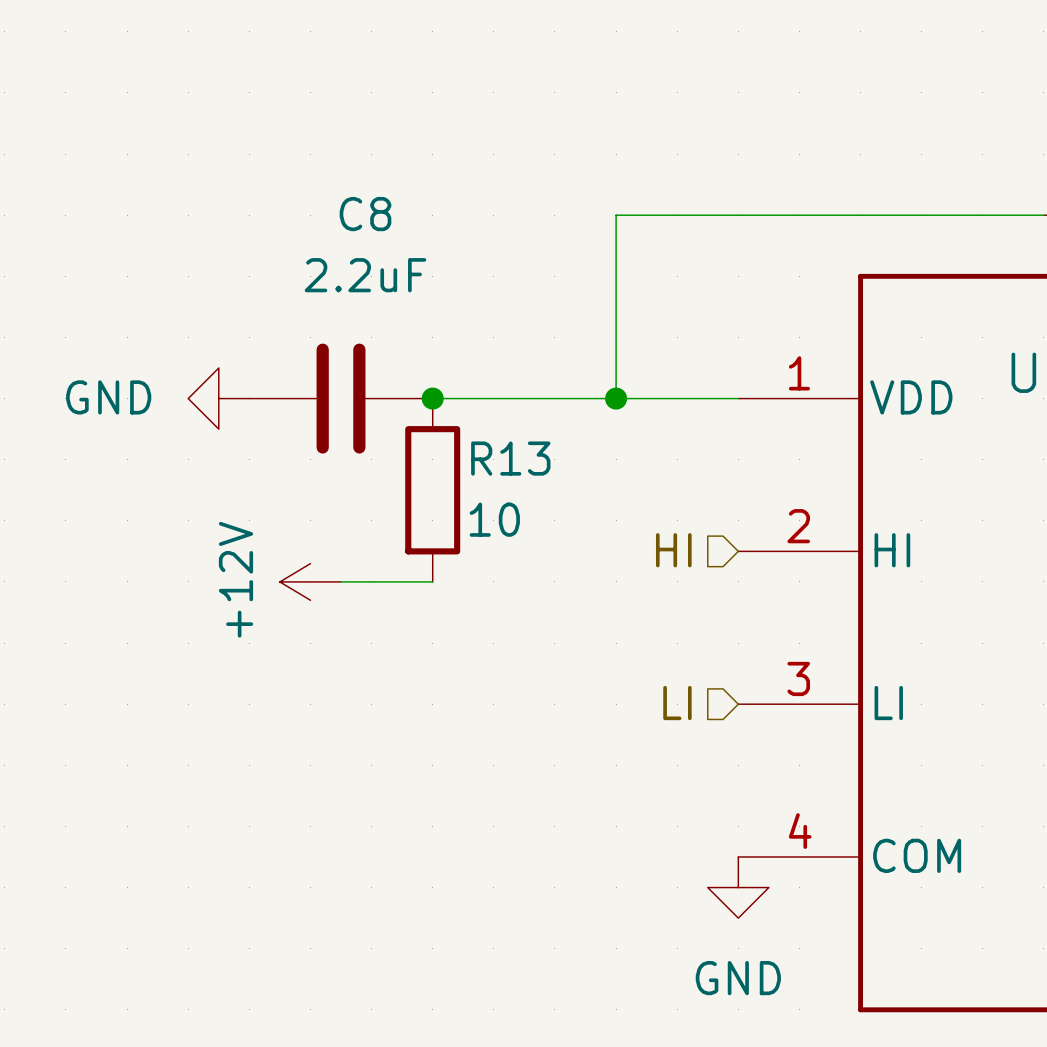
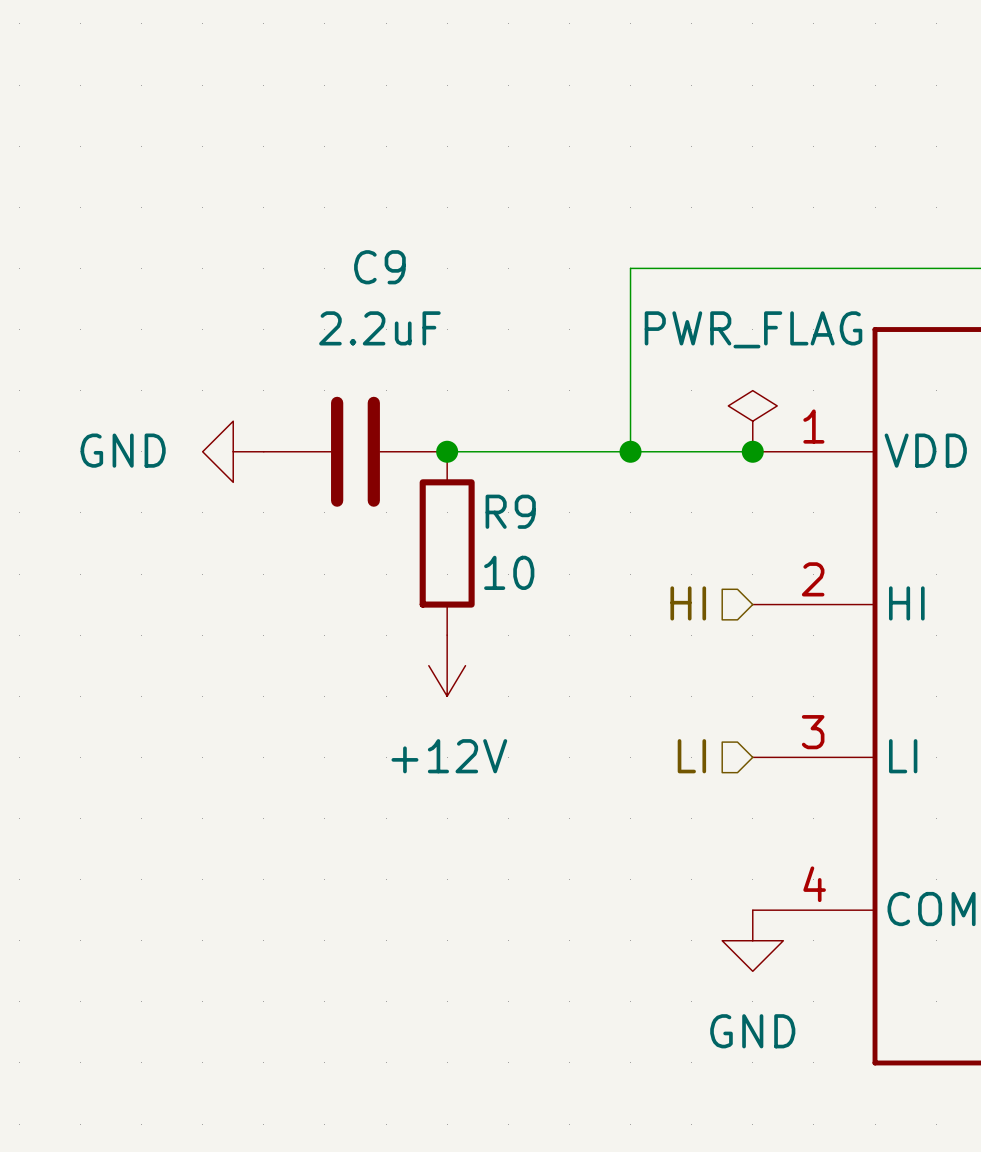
C8 name: C8 (365, 214) -> C9 (379, 267)
power symbol: none -> PWR_FLAG (752, 421)
junction: none -> (752, 451)
R13 name: R13 (510, 458) -> R9 (510, 511)
power symbol rotation: 0° (310, 581) -> 90° counterclockwise (447, 665)
power symbol position: +12V (310, 581) -> +12V (447, 665)
wire: (341, 581) (432, 581) -> none

